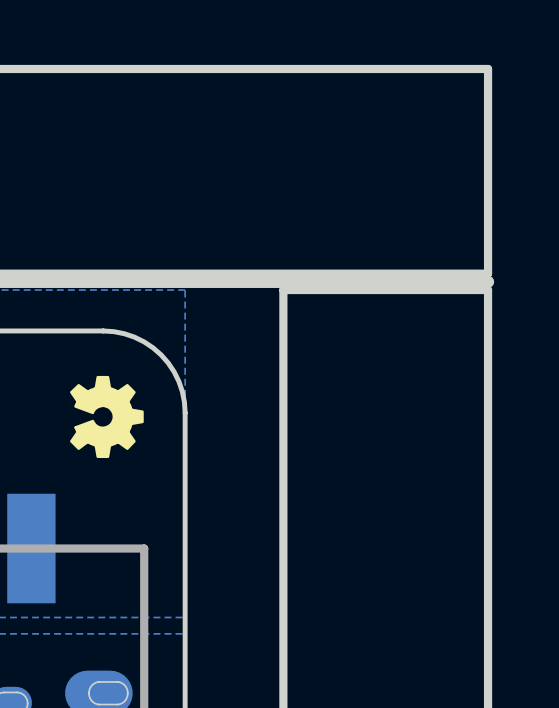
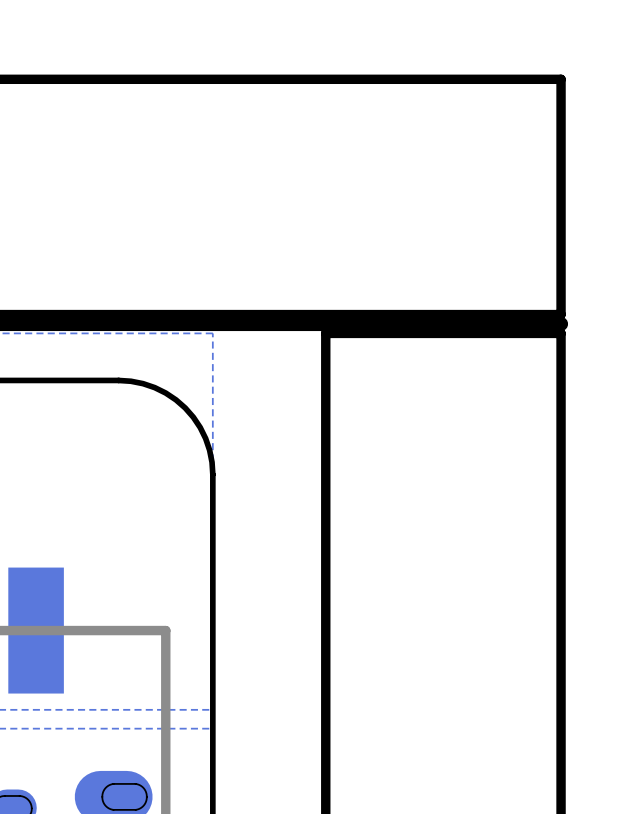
drawing: [70, 375, 144, 459] -> none

